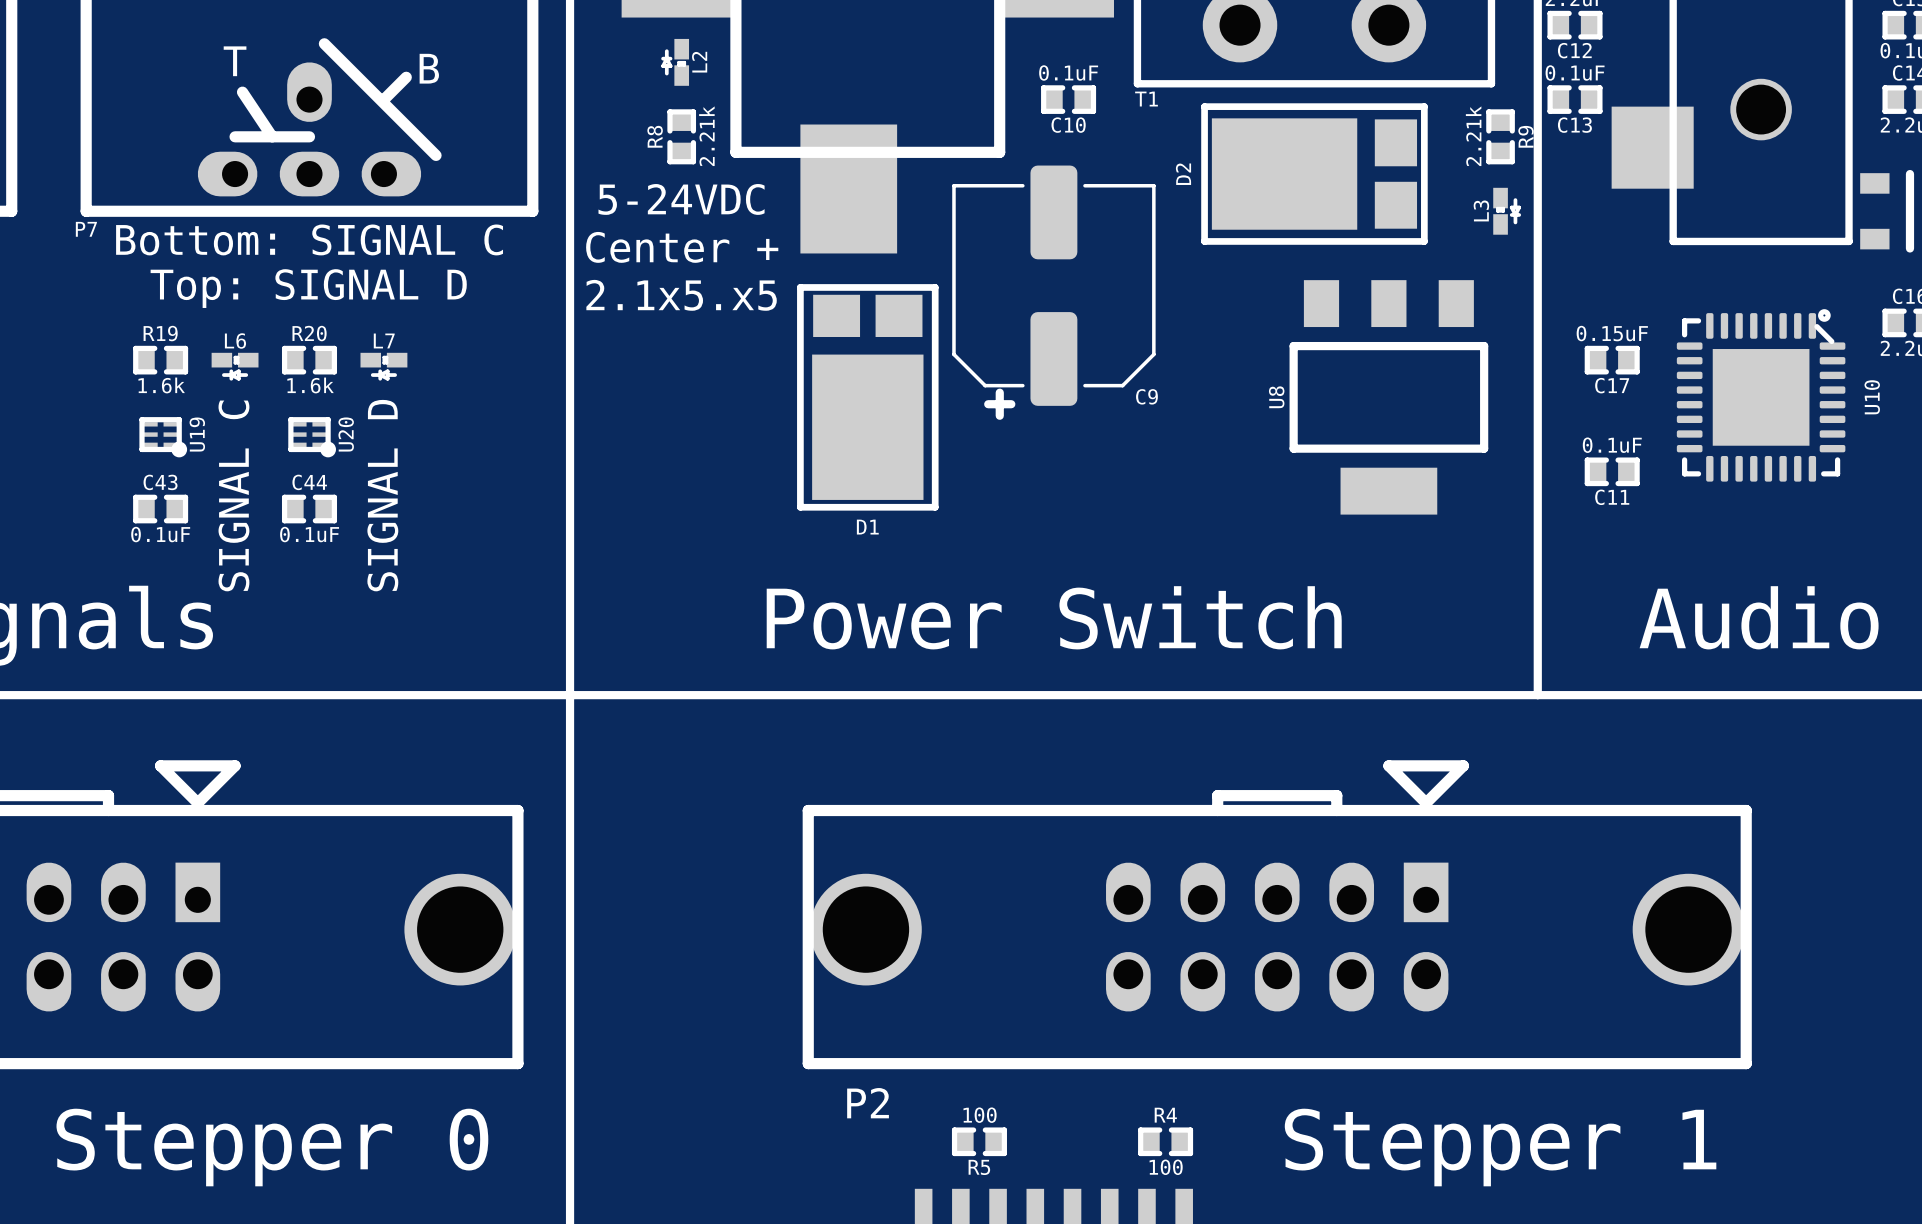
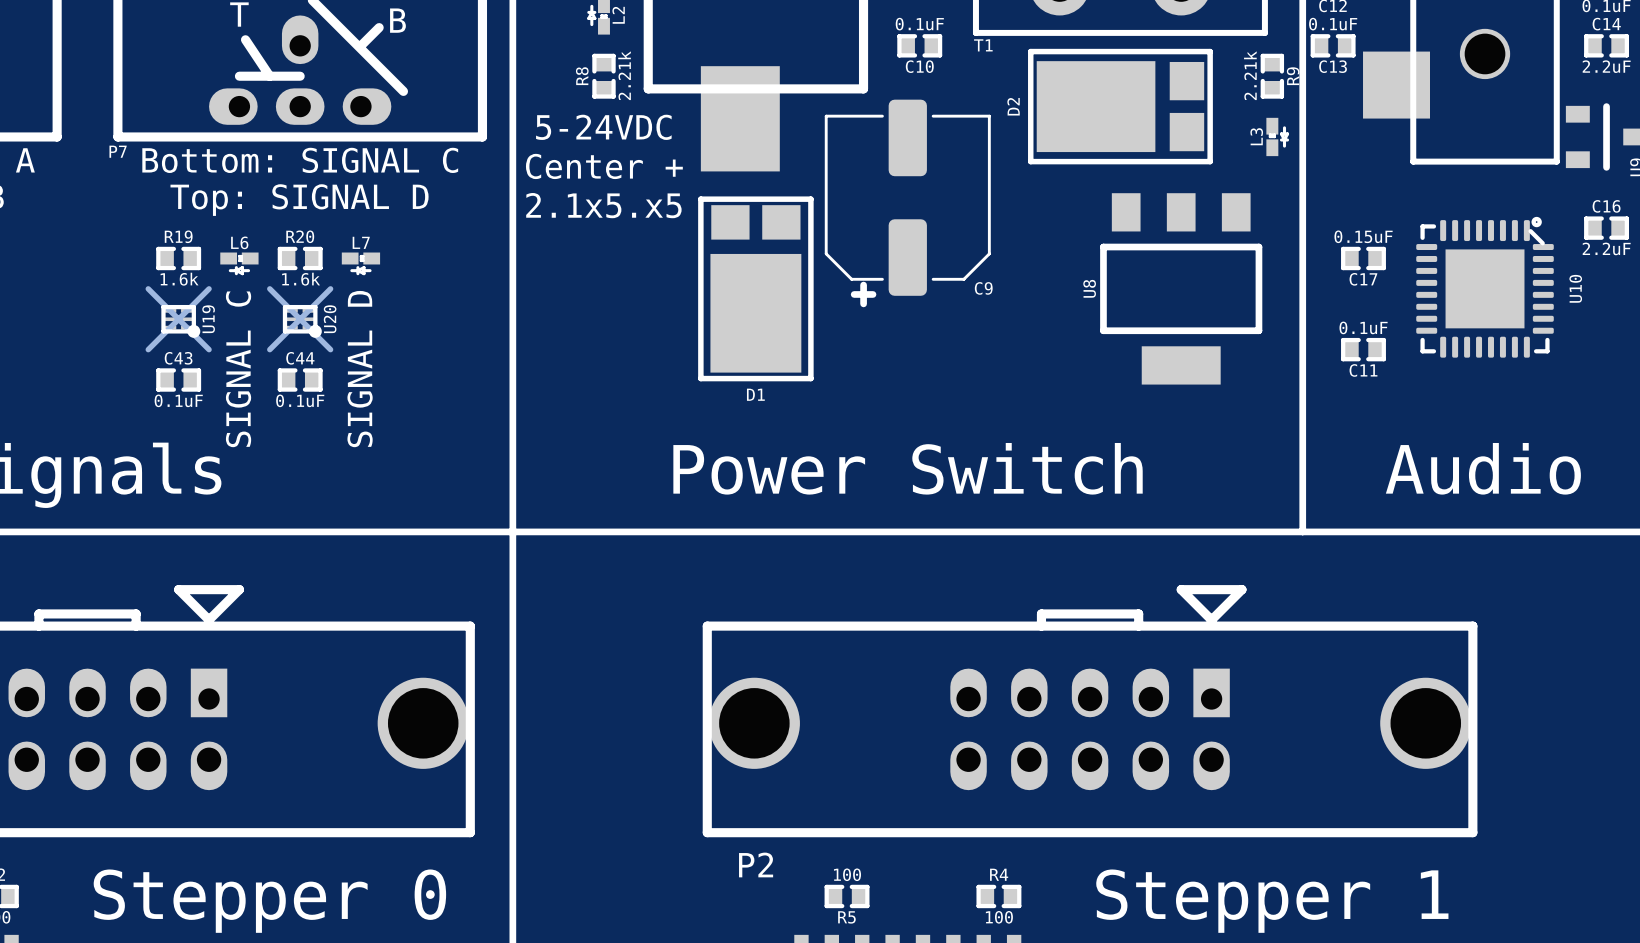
line: none -> (148, 288) (209, 349)
line: none -> (209, 288) (148, 349)
line: none -> (269, 288) (330, 349)
line: none -> (330, 288) (269, 349)

